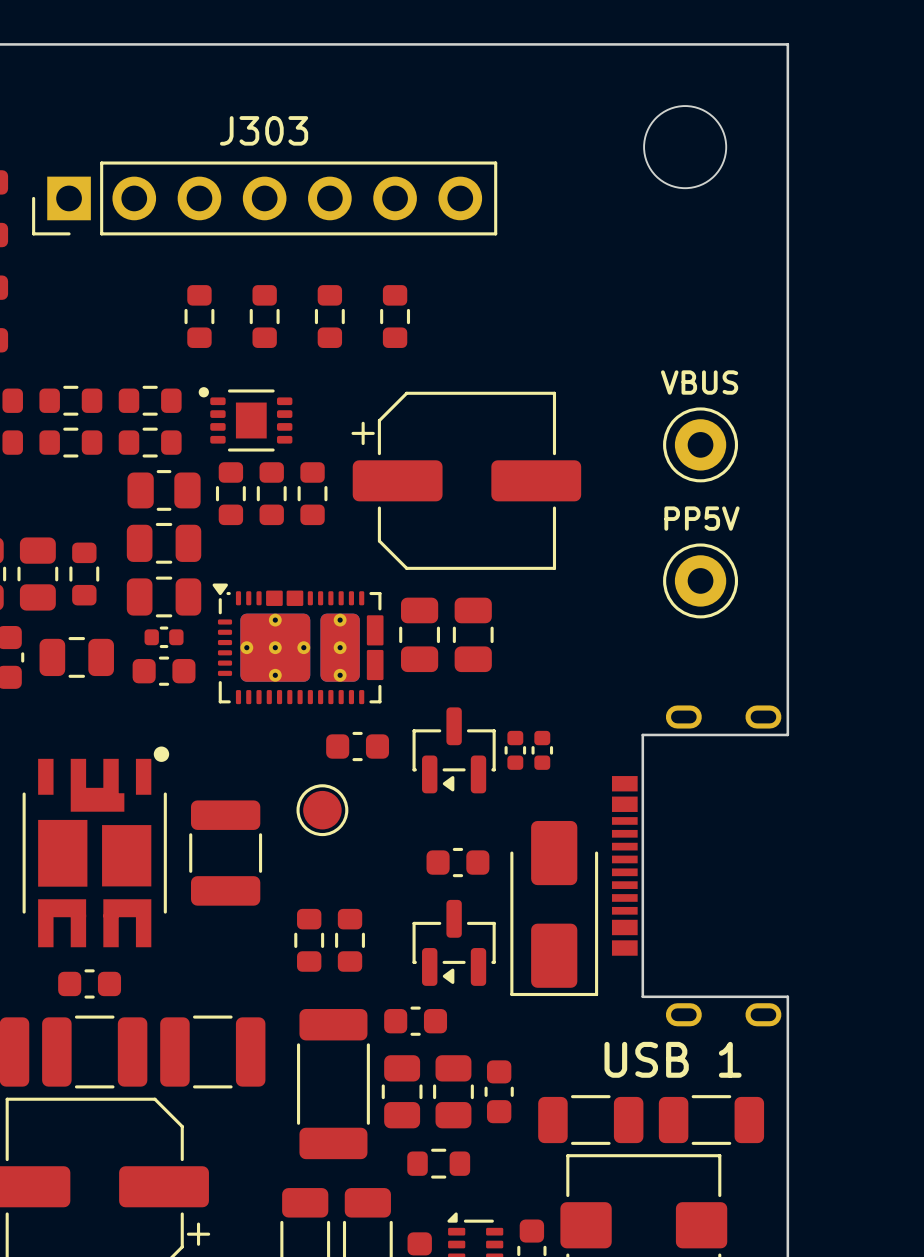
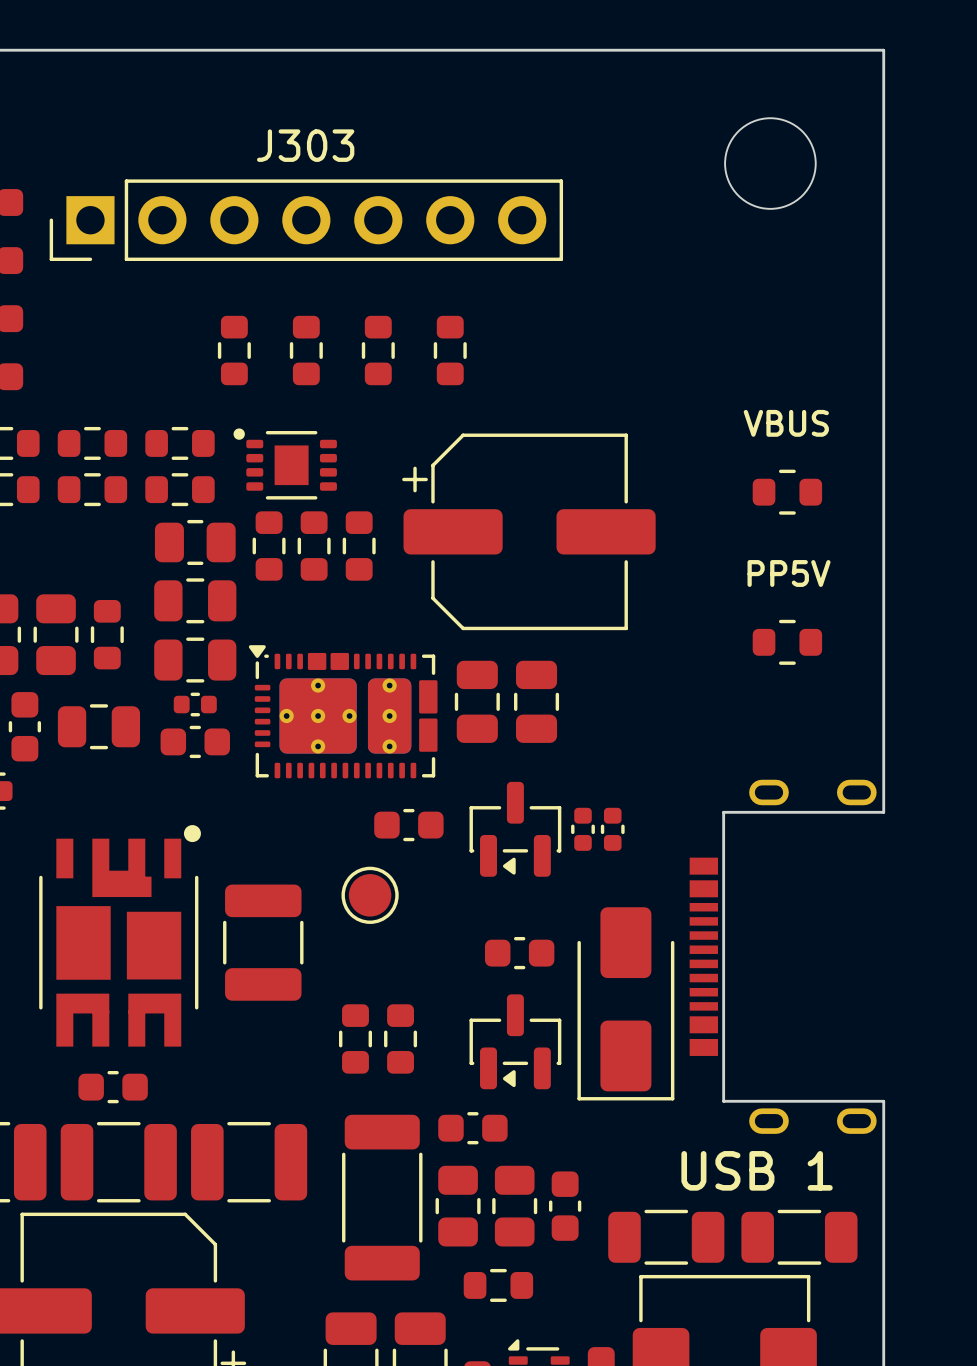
part footprint: [663, 407, 739, 483] -> [752, 469, 823, 515]
part footprint: [663, 543, 739, 619] -> [752, 619, 823, 665]

